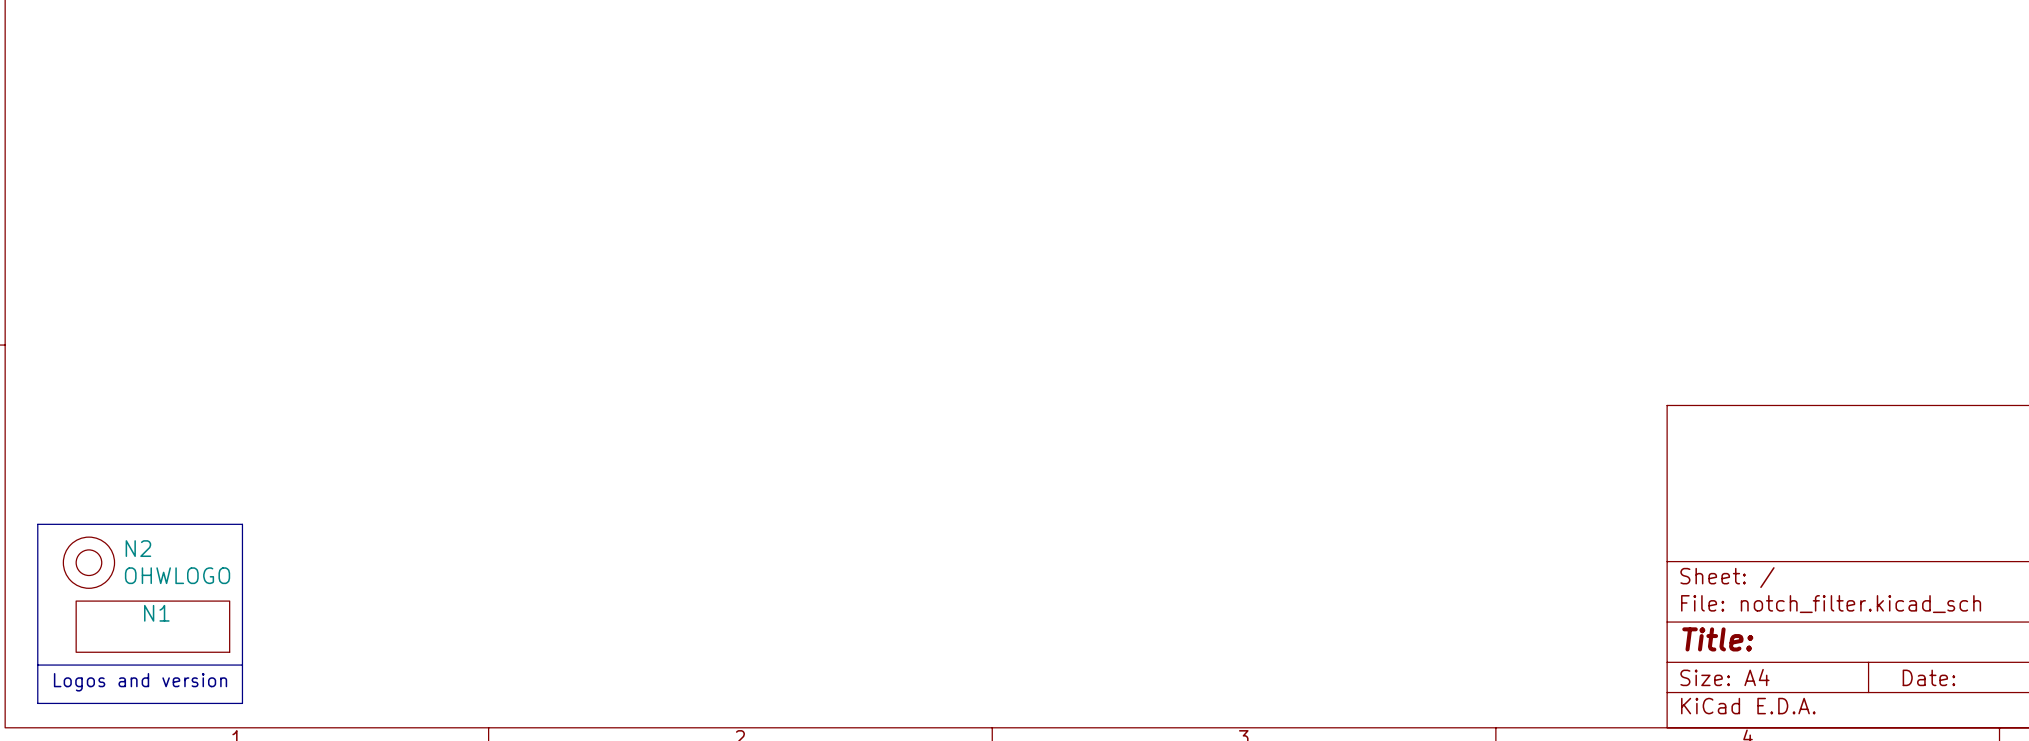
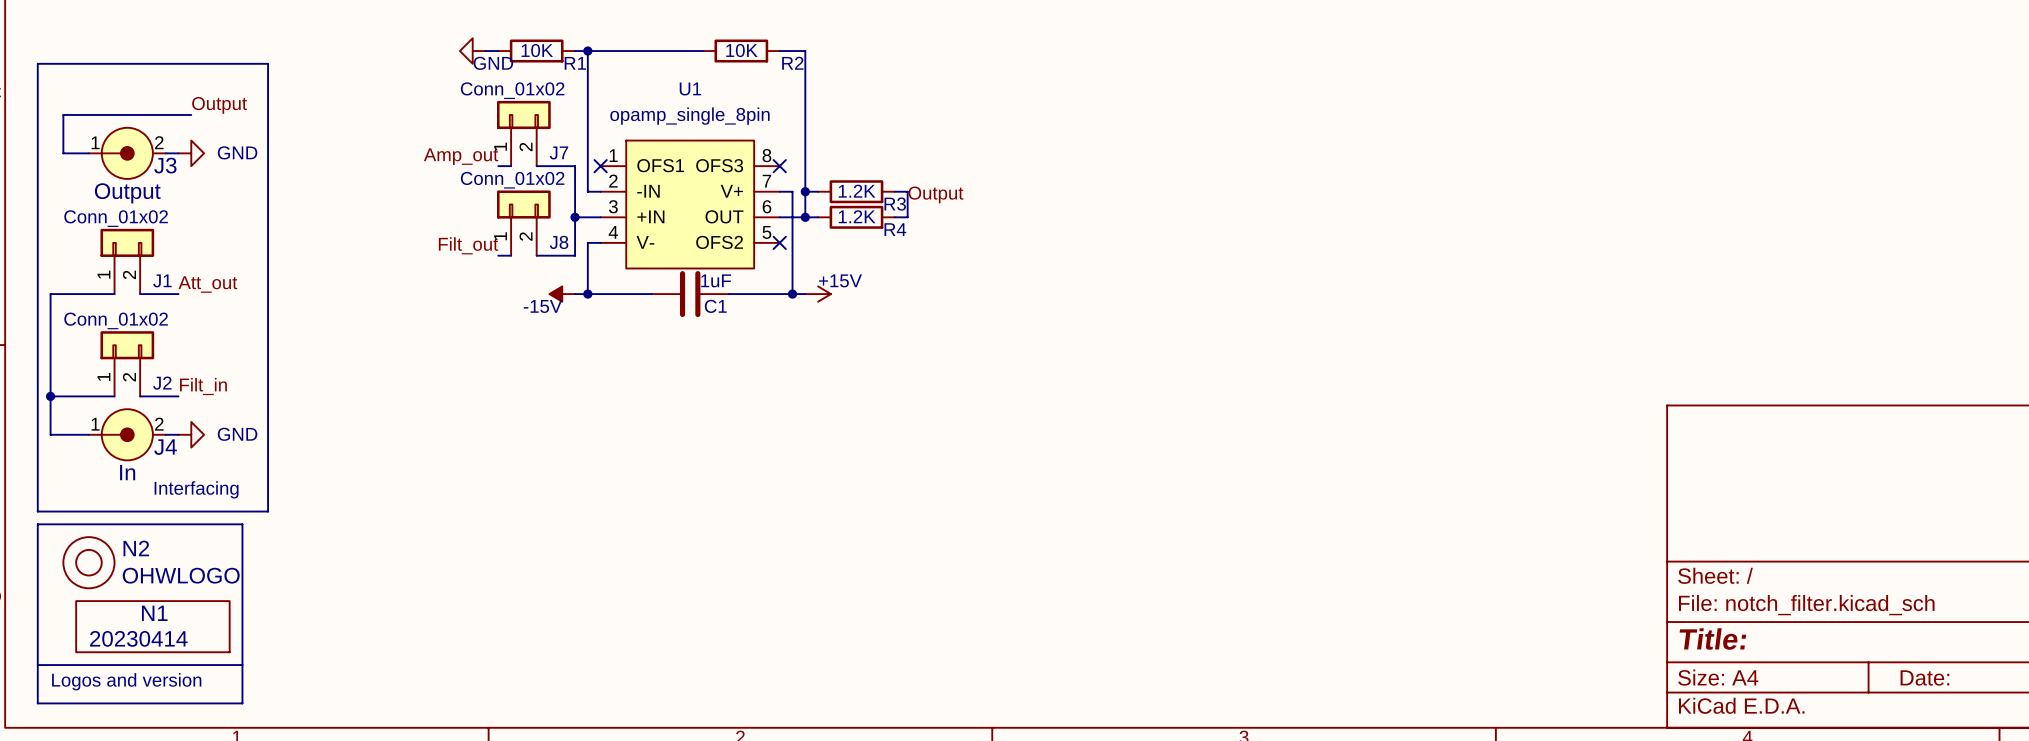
power symbol: none -> GND (472, 51)
wire: none -> (485, 51) (498, 51)
R1: none -> 10K (536, 51)
wire: none -> (575, 51) (702, 51)
wire: none -> (587, 51) (587, 191) (600, 191)
junction: none -> (587, 51)
R2: none -> 10K (741, 51)
wire: none -> (779, 51) (805, 51) (805, 217)
line: none -> (37, 63) (37, 511) (268, 511) (268, 63) (37, 63)
label: none -> Output (219, 105)
wire: none -> (191, 114) (63, 114) (63, 153) (88, 153)
J7: none -> Conn_01x02 (523, 133)
J3: none -> Output (127, 153)
wire: none -> (165, 153) (178, 153)
power symbol: none -> GND (191, 153)
label: none -> Amp_out (461, 156)
wire: none -> (498, 166) (511, 166)
wire: none -> (536, 166) (575, 166) (575, 255) (536, 255)
no-connect mark: none -> (600, 166)
no-connect mark: none -> (779, 166)
wire: none -> (779, 191) (792, 191) (792, 294)
wire: none -> (805, 191) (818, 191)
junction: none -> (805, 191)
R3: none -> 1.2K (856, 191)
wire: none -> (894, 191) (907, 191) (907, 217) (894, 217)
label: none -> Output (935, 194)
U1: none -> opamp_single_8pin (690, 204)
wire: none -> (575, 217) (600, 217)
junction: none -> (575, 217)
wire: none -> (779, 217) (818, 217)
junction: none -> (805, 217)
R4: none -> 1.2K (856, 217)
J8: none -> Conn_01x02 (523, 223)
wire: none -> (600, 242) (587, 242) (587, 294)
no-connect mark: none -> (779, 242)
label: none -> Filt_out (468, 245)
wire: none -> (498, 255) (511, 255)
J1: none -> Conn_01x02 (127, 261)
label: none -> Att_out (207, 284)
wire: none -> (114, 294) (50, 294) (50, 434) (88, 434)
wire: none -> (140, 294) (178, 294)
power symbol: none -> -15V (562, 294)
wire: none -> (575, 294) (651, 294)
junction: none -> (587, 294)
C1: none -> 1uF (690, 294)
wire: none -> (728, 294) (805, 294)
junction: none -> (792, 294)
power symbol: none -> +15V (818, 294)
J2: none -> Conn_01x02 (127, 363)
label: none -> Filt_in (203, 386)
wire: none -> (50, 396) (114, 396)
junction: none -> (50, 396)
wire: none -> (140, 396) (178, 396)
J4: none -> In (127, 434)
wire: none -> (165, 434) (178, 434)
power symbol: none -> GND (191, 434)
text: none -> Interfacing (196, 489)
N1 value: none -> 20230414 (138, 638)

